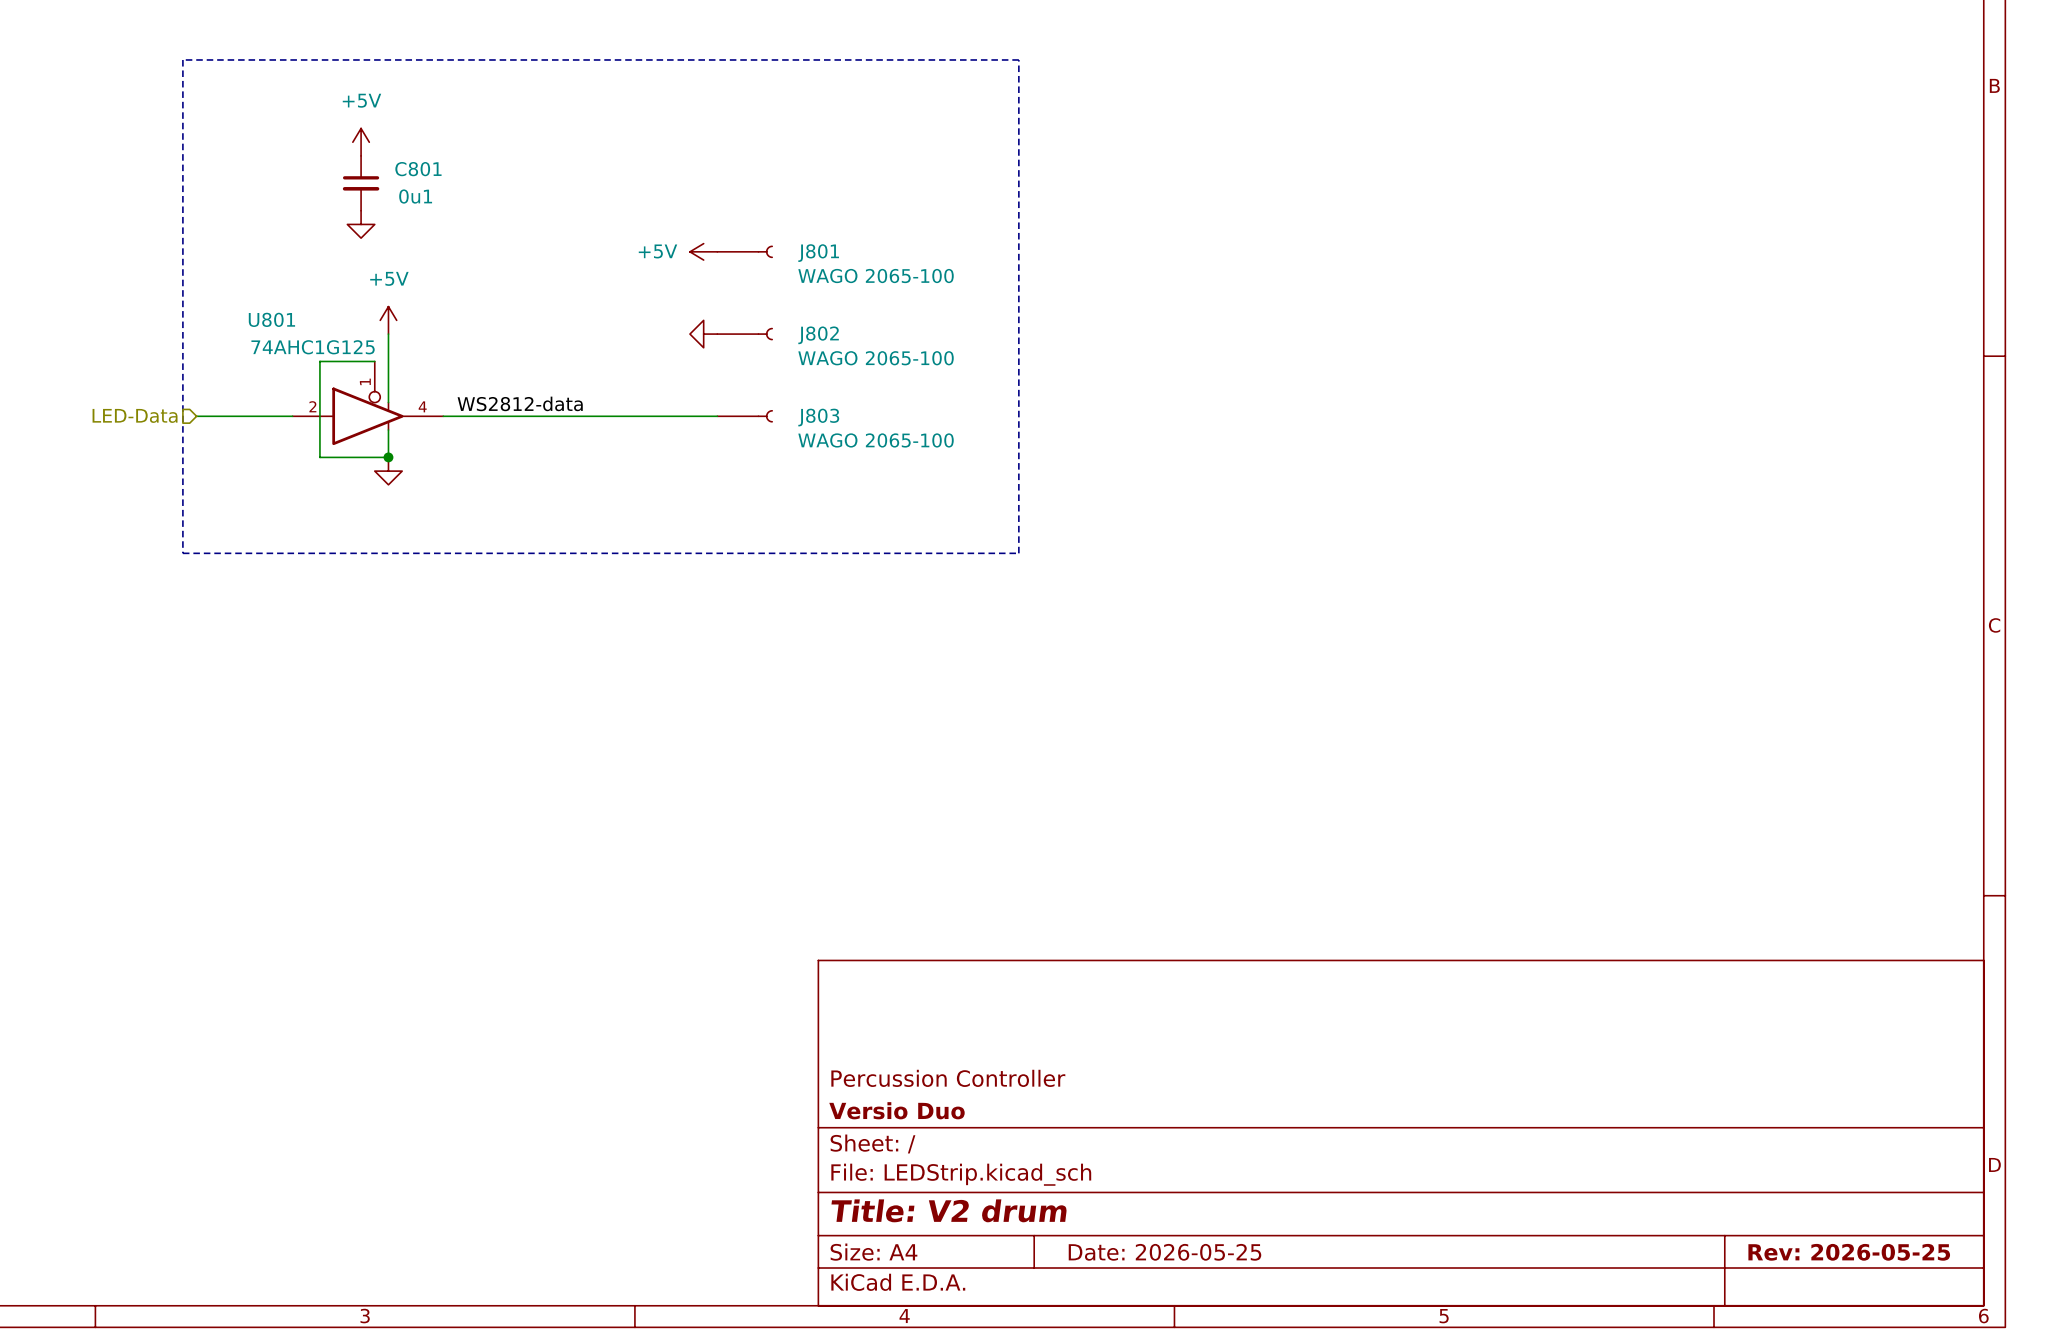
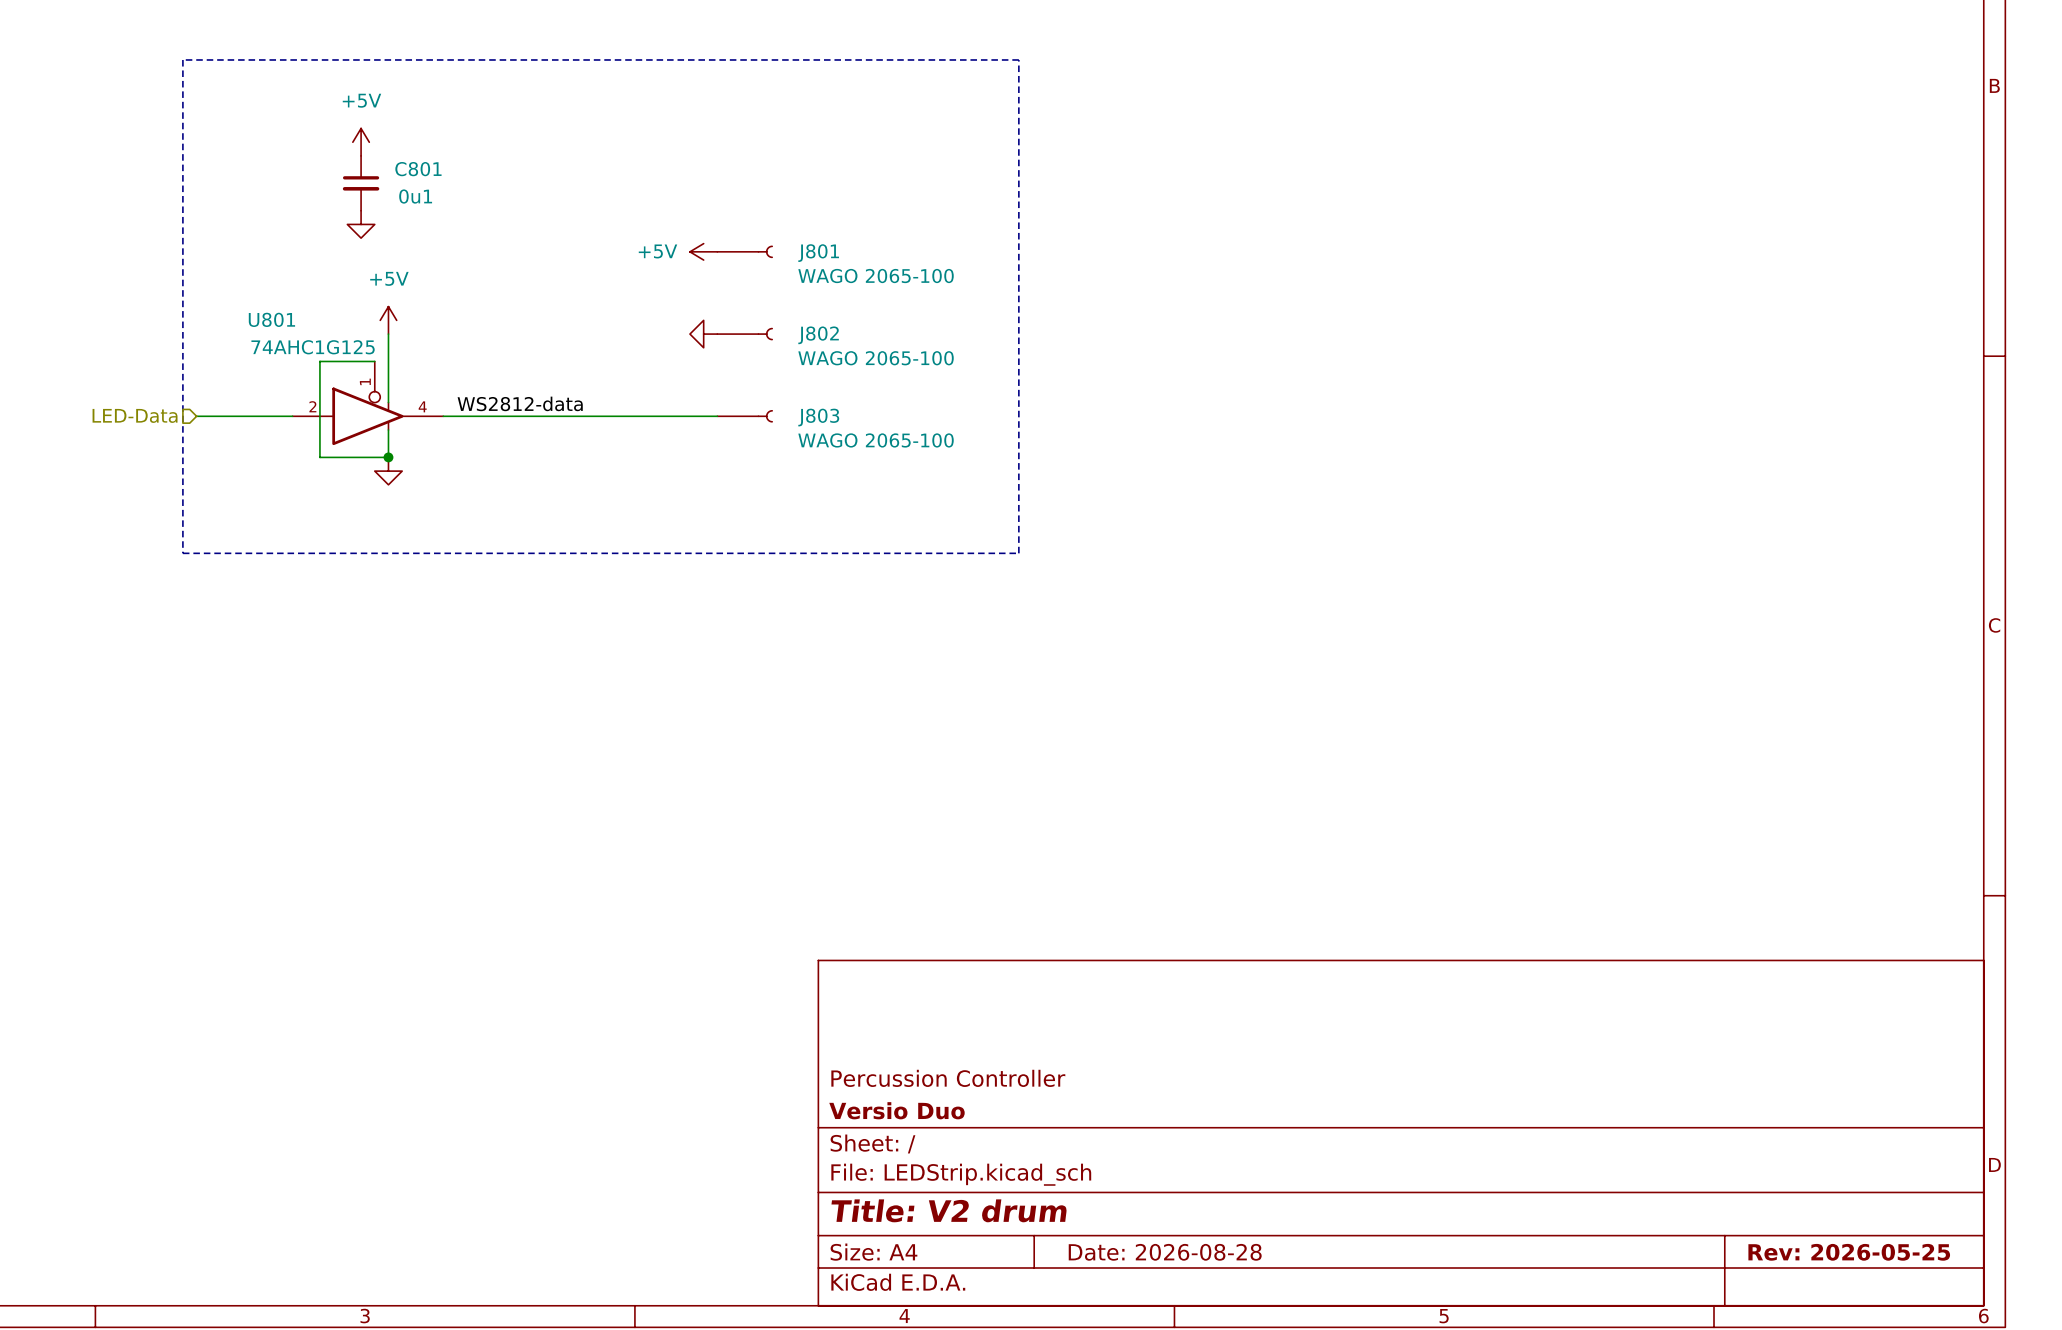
title block: Date: 2026-05-25 (1164, 1252) -> Date: 2026-08-28 (1165, 1252)

